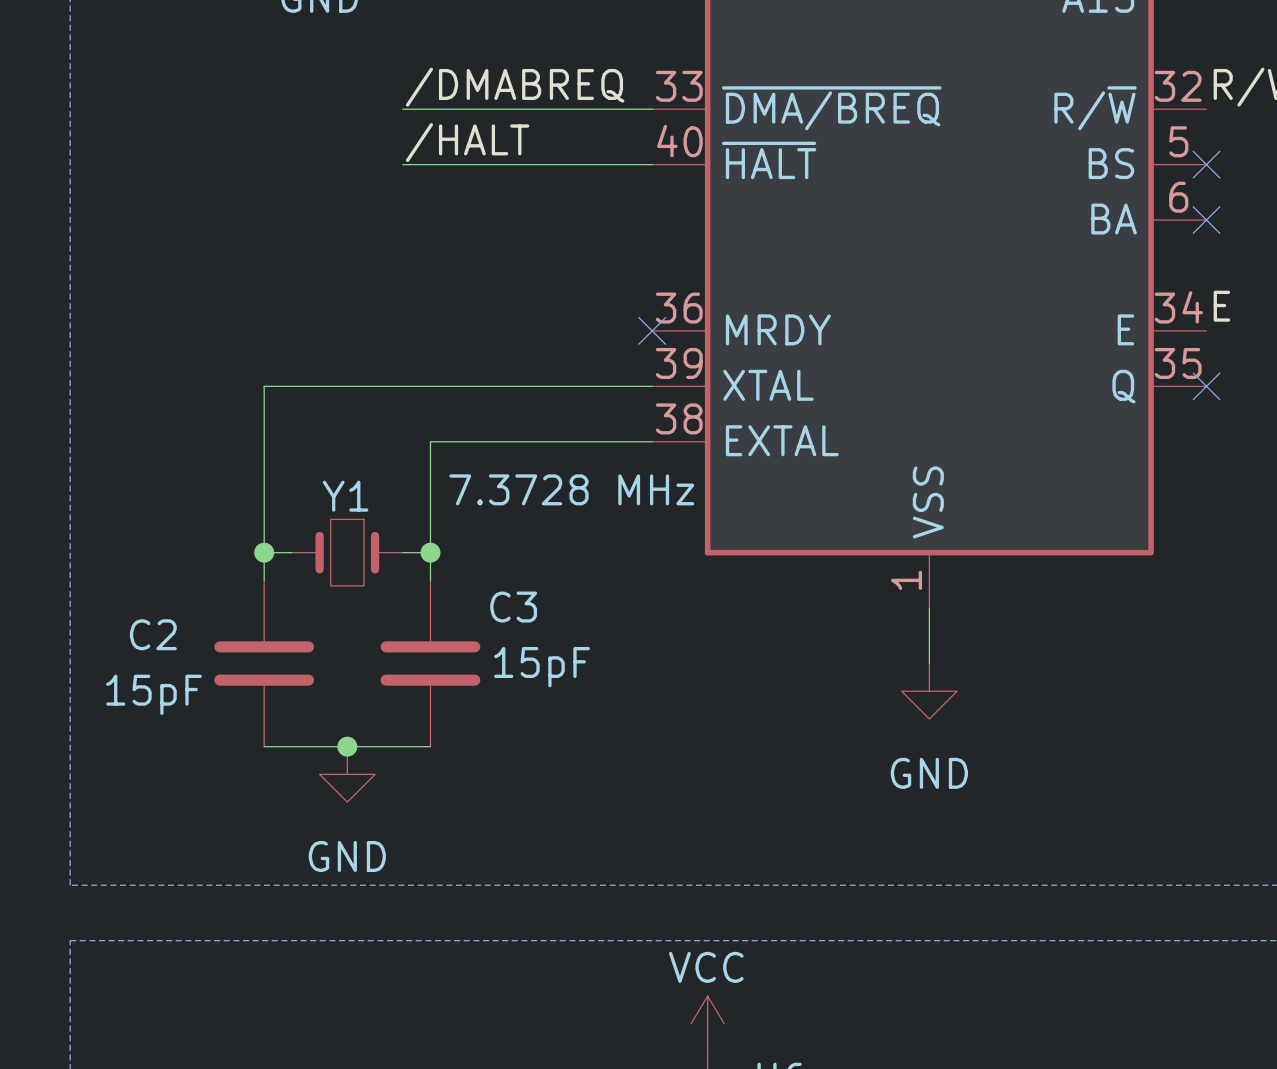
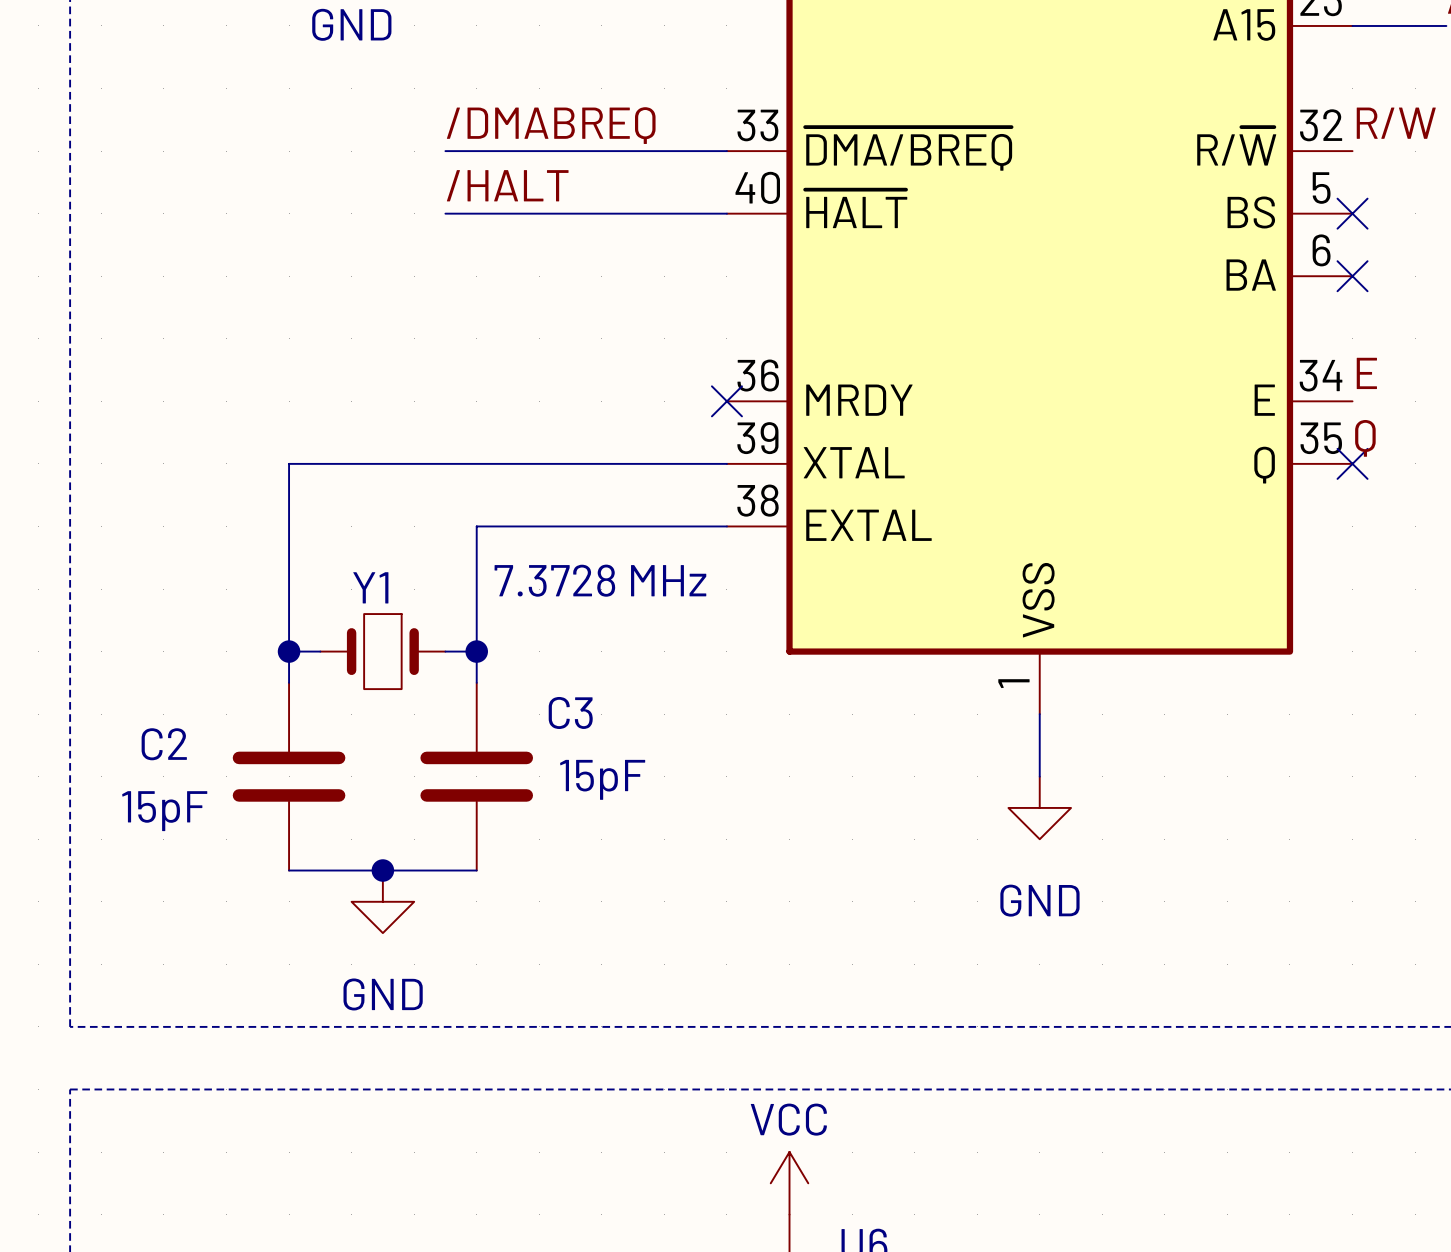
label: none -> Q (1365, 438)

